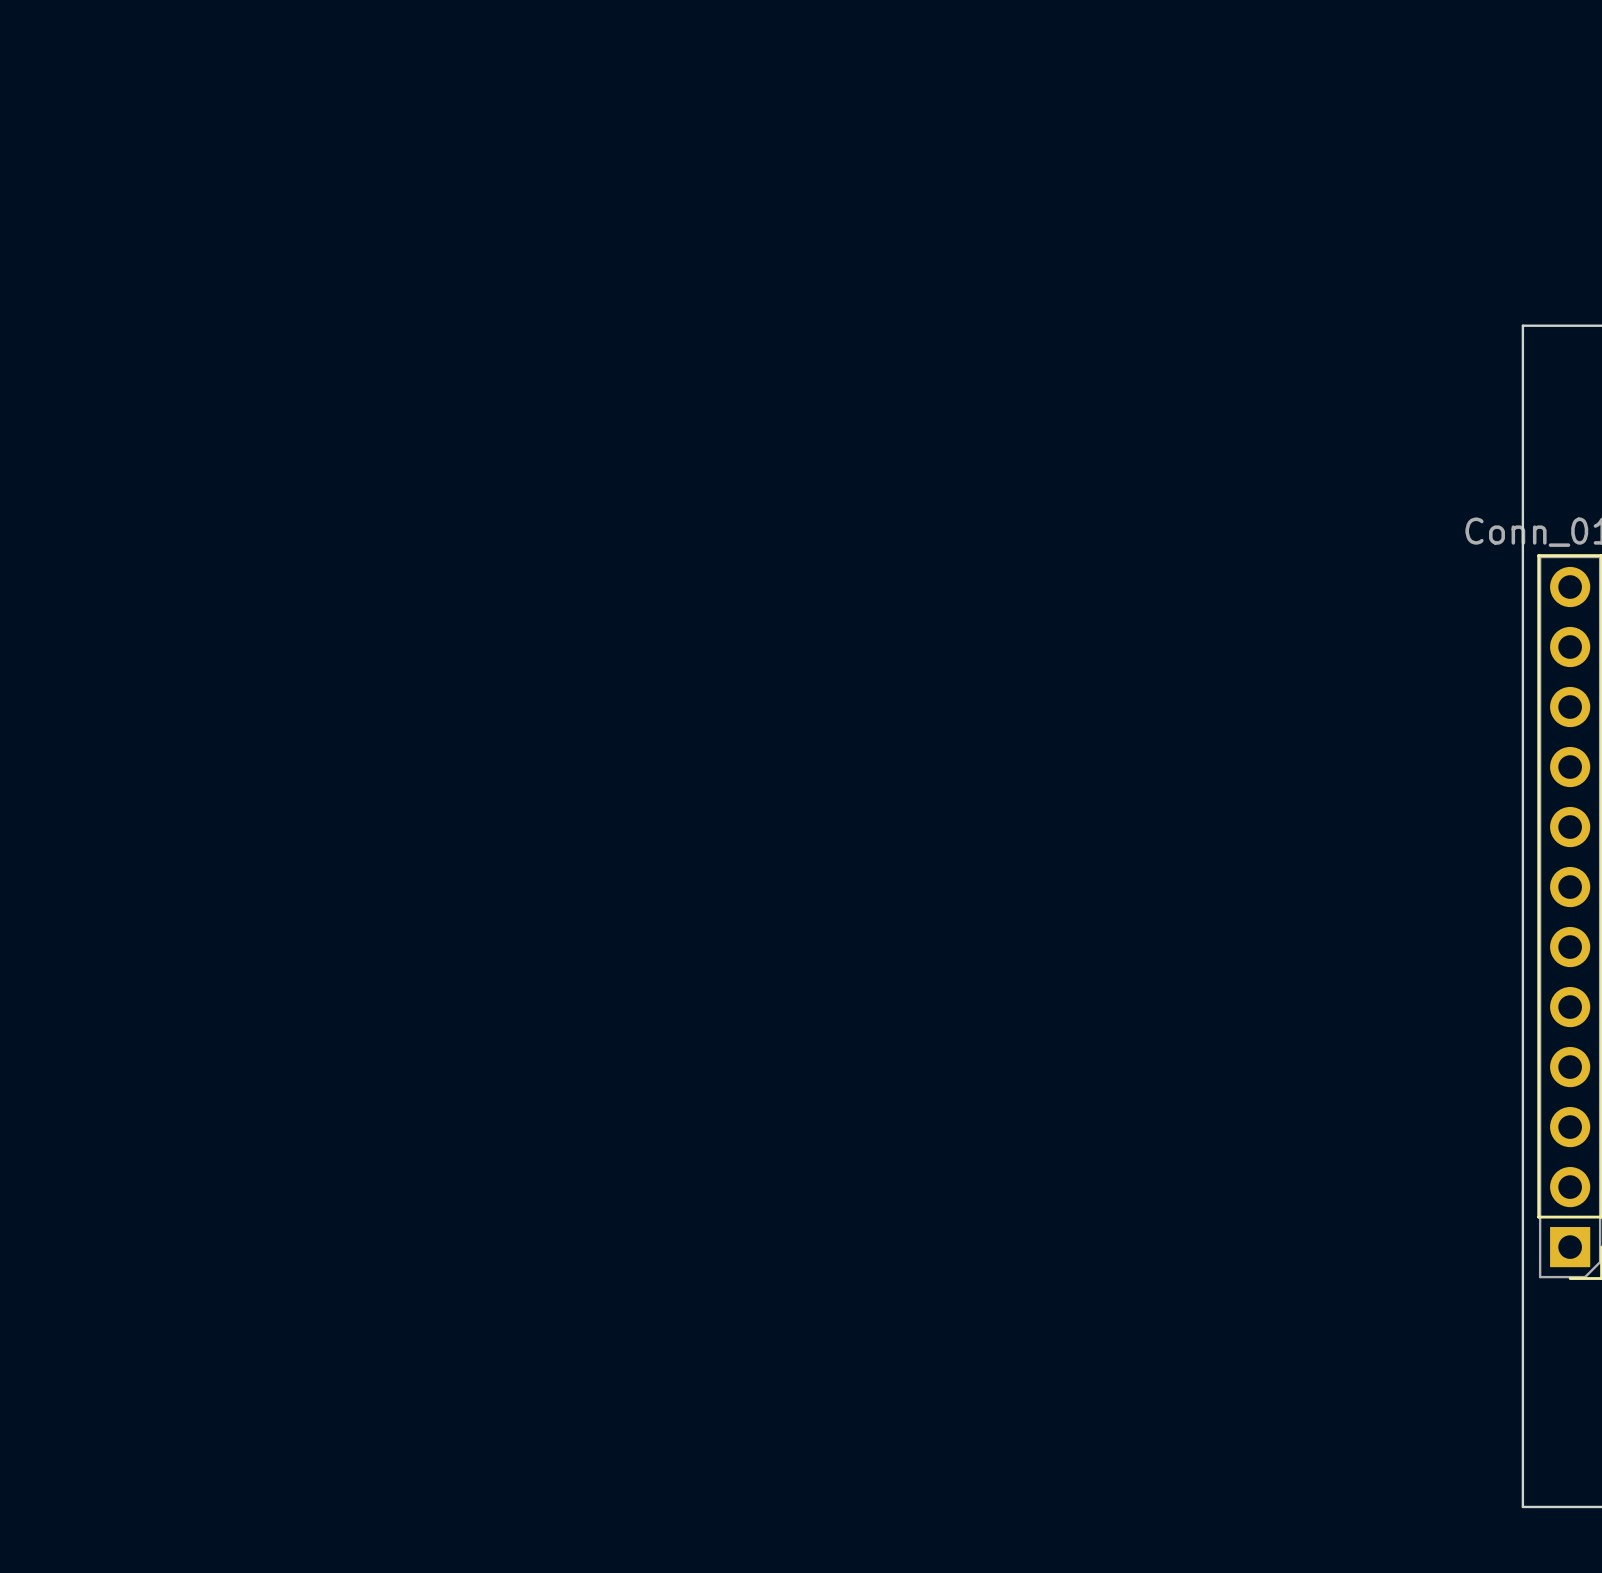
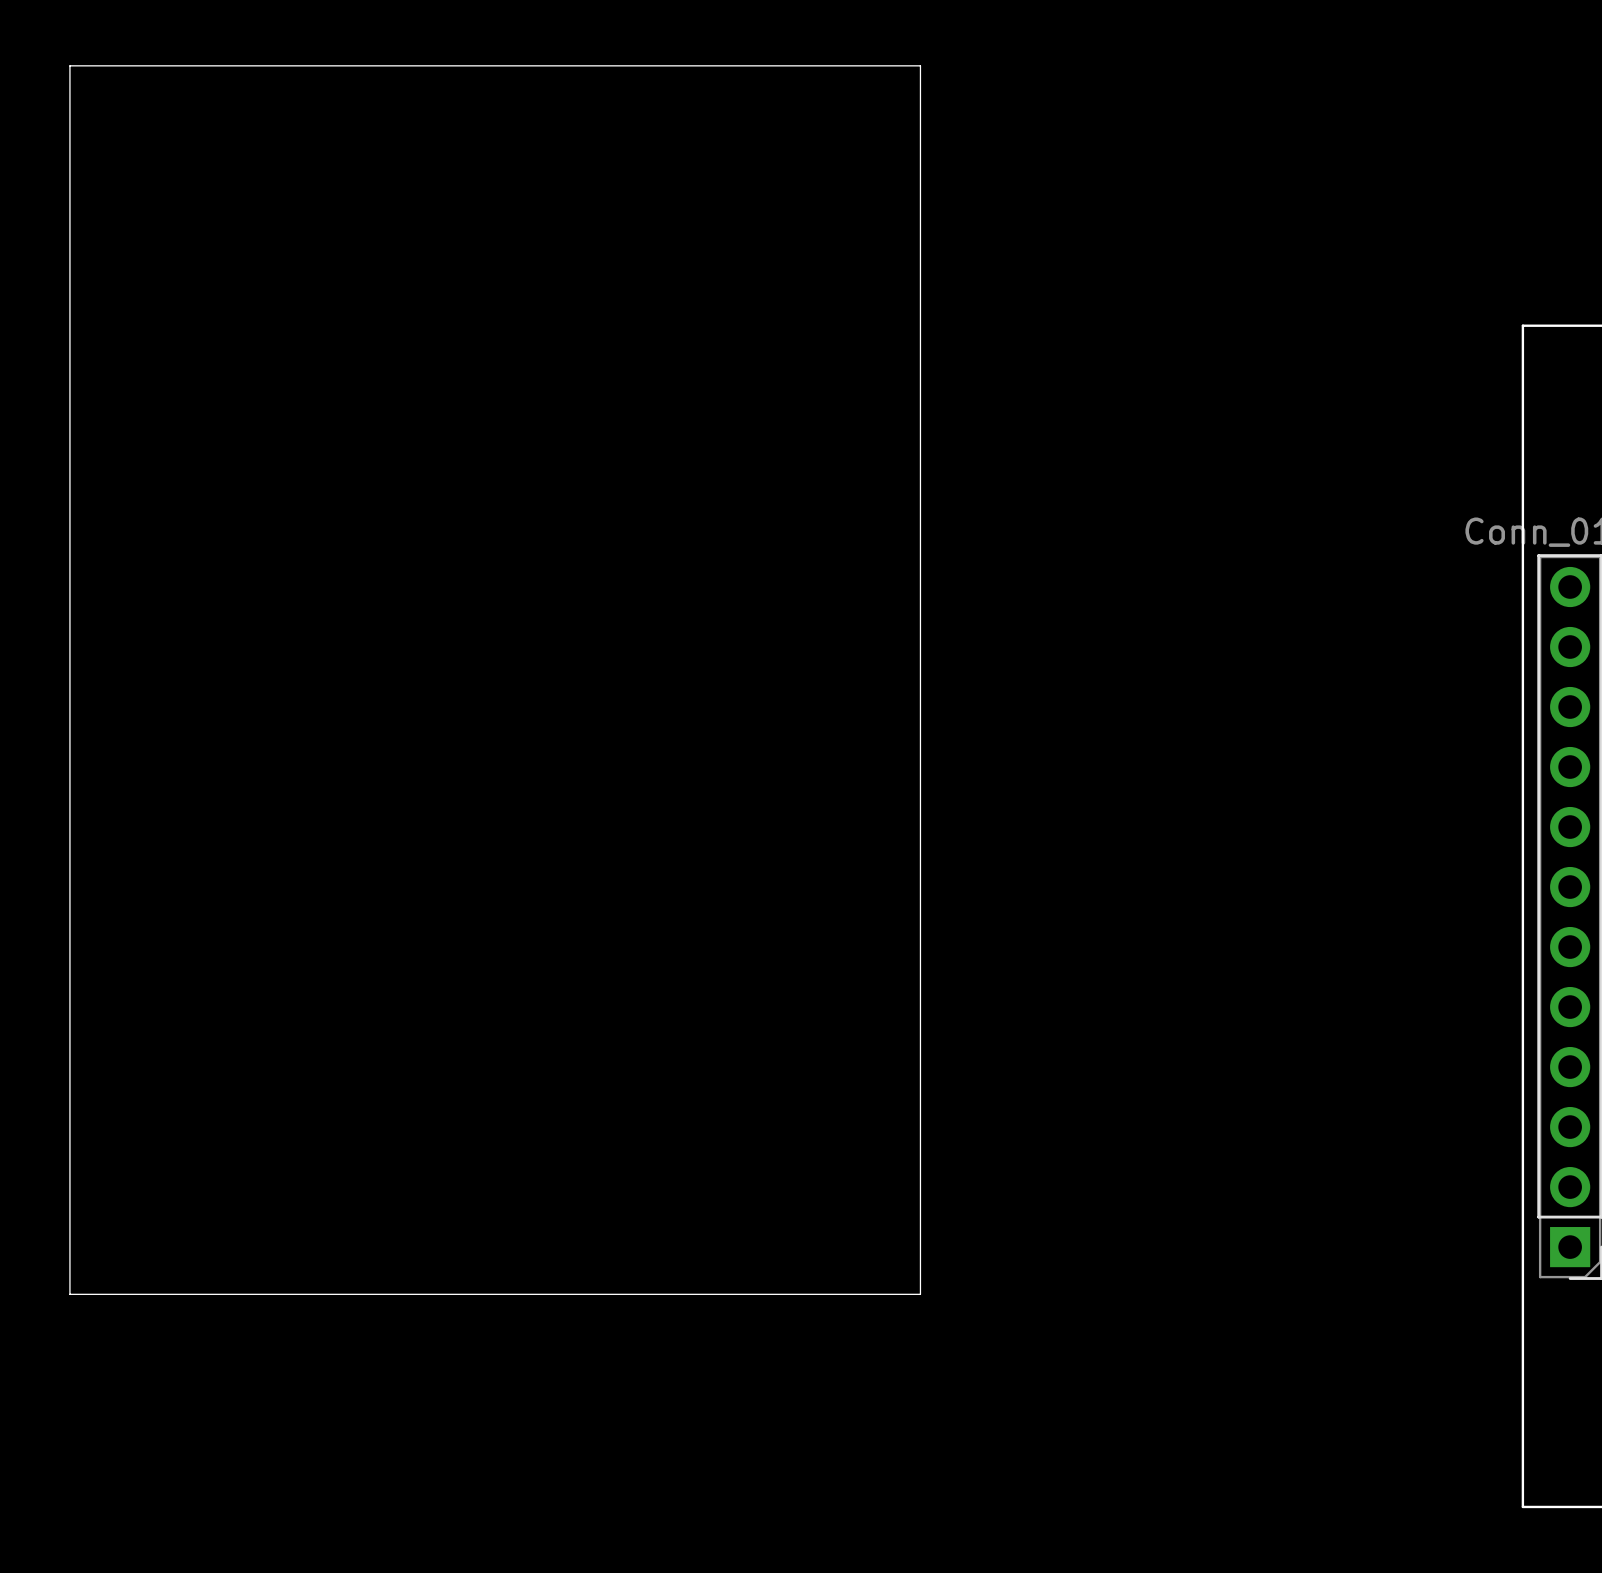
board edge: none -> (920, 65) (920, 1294) (69, 1294) (69, 65) (920, 65)

